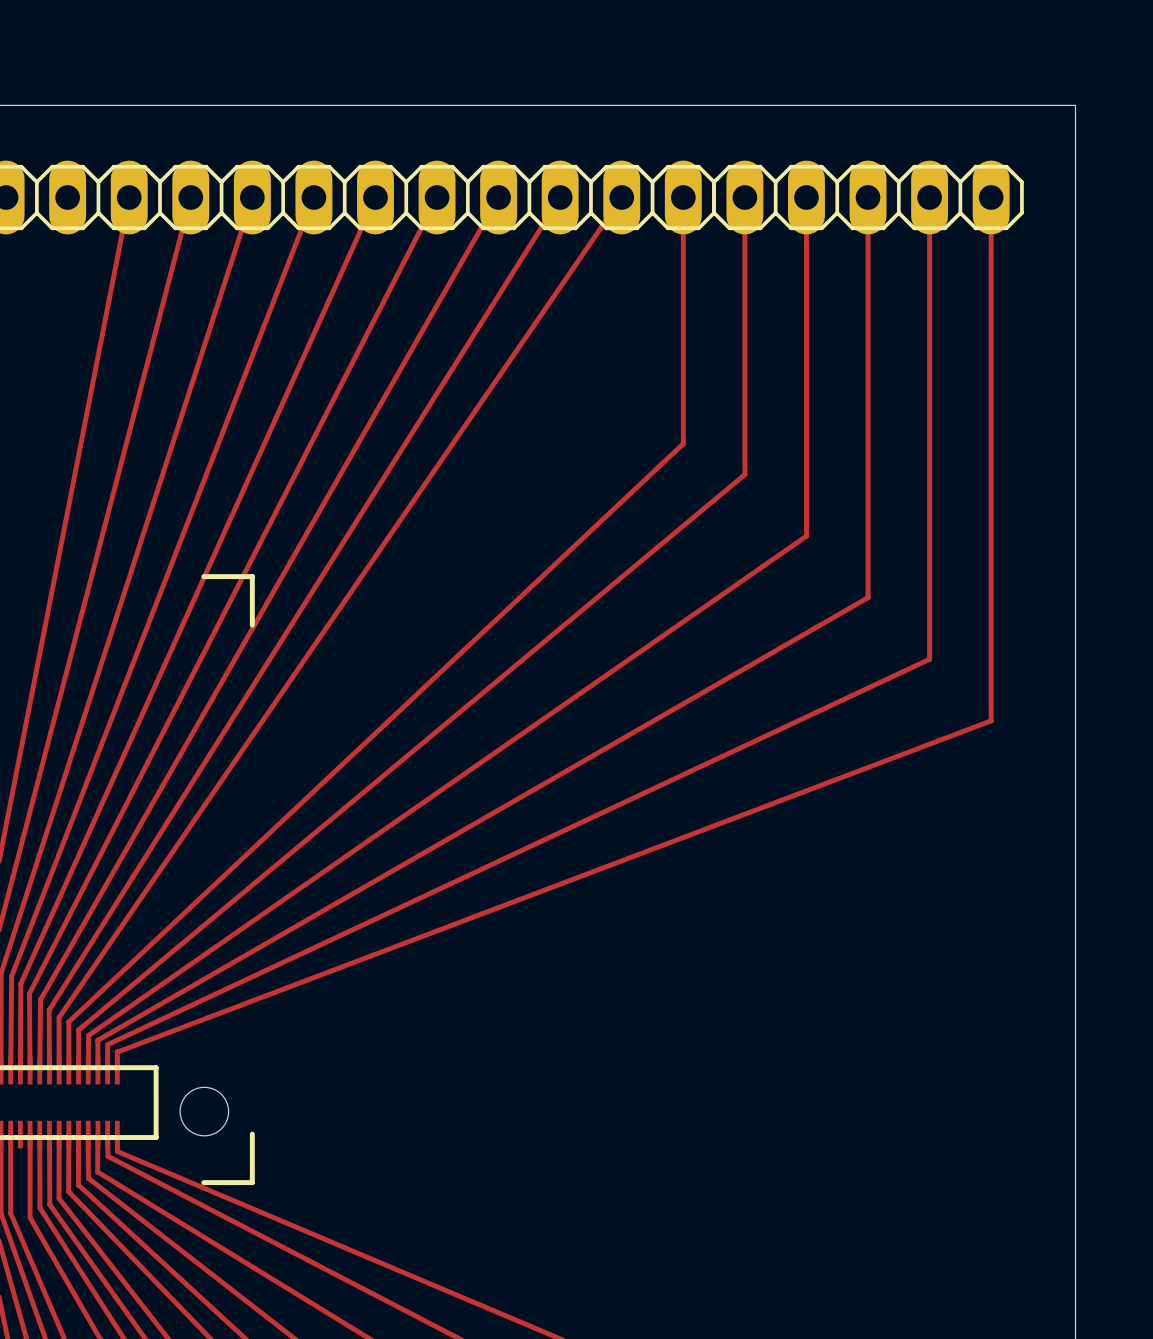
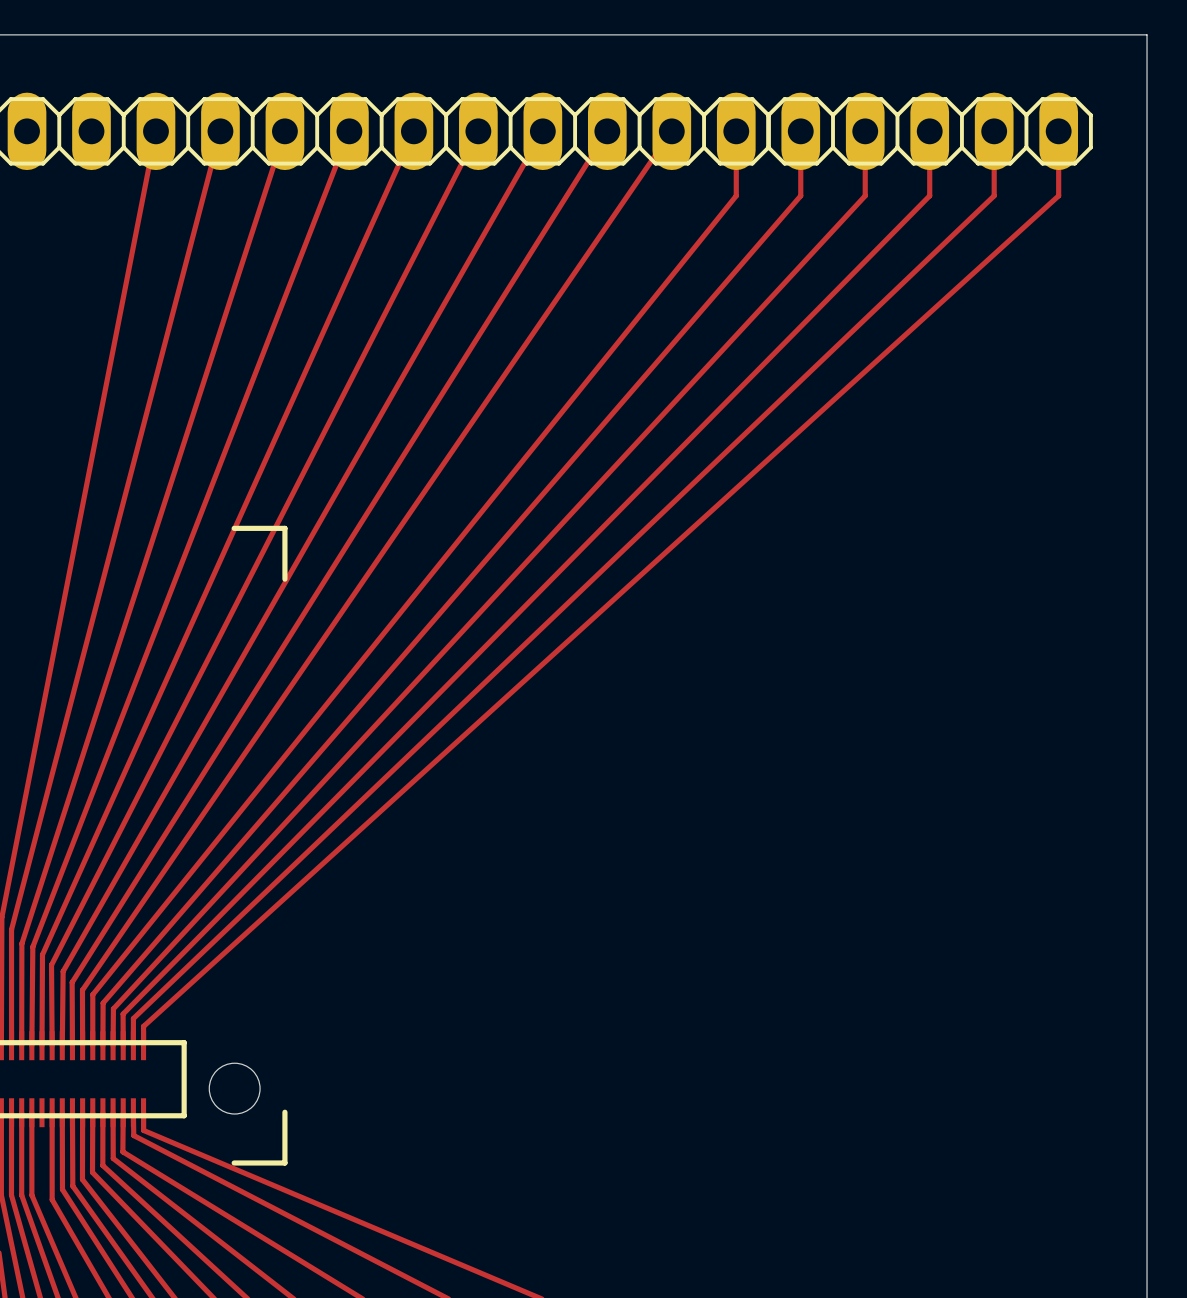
track: (683, 259) (683, 443) (68, 1021) -> (736, 195) (92, 994)
track: (744, 259) (744, 474) (78, 1029) -> (800, 195) (103, 1003)
track: (806, 259) (806, 536) (88, 1035) -> (865, 195) (113, 1008)
track: (868, 259) (868, 597) (97, 1040) -> (929, 195) (123, 1014)
track: (929, 259) (929, 659) (107, 1044) -> (994, 195) (133, 1018)
track: (991, 259) (991, 720) (117, 1052) -> (1058, 195) (143, 1026)

